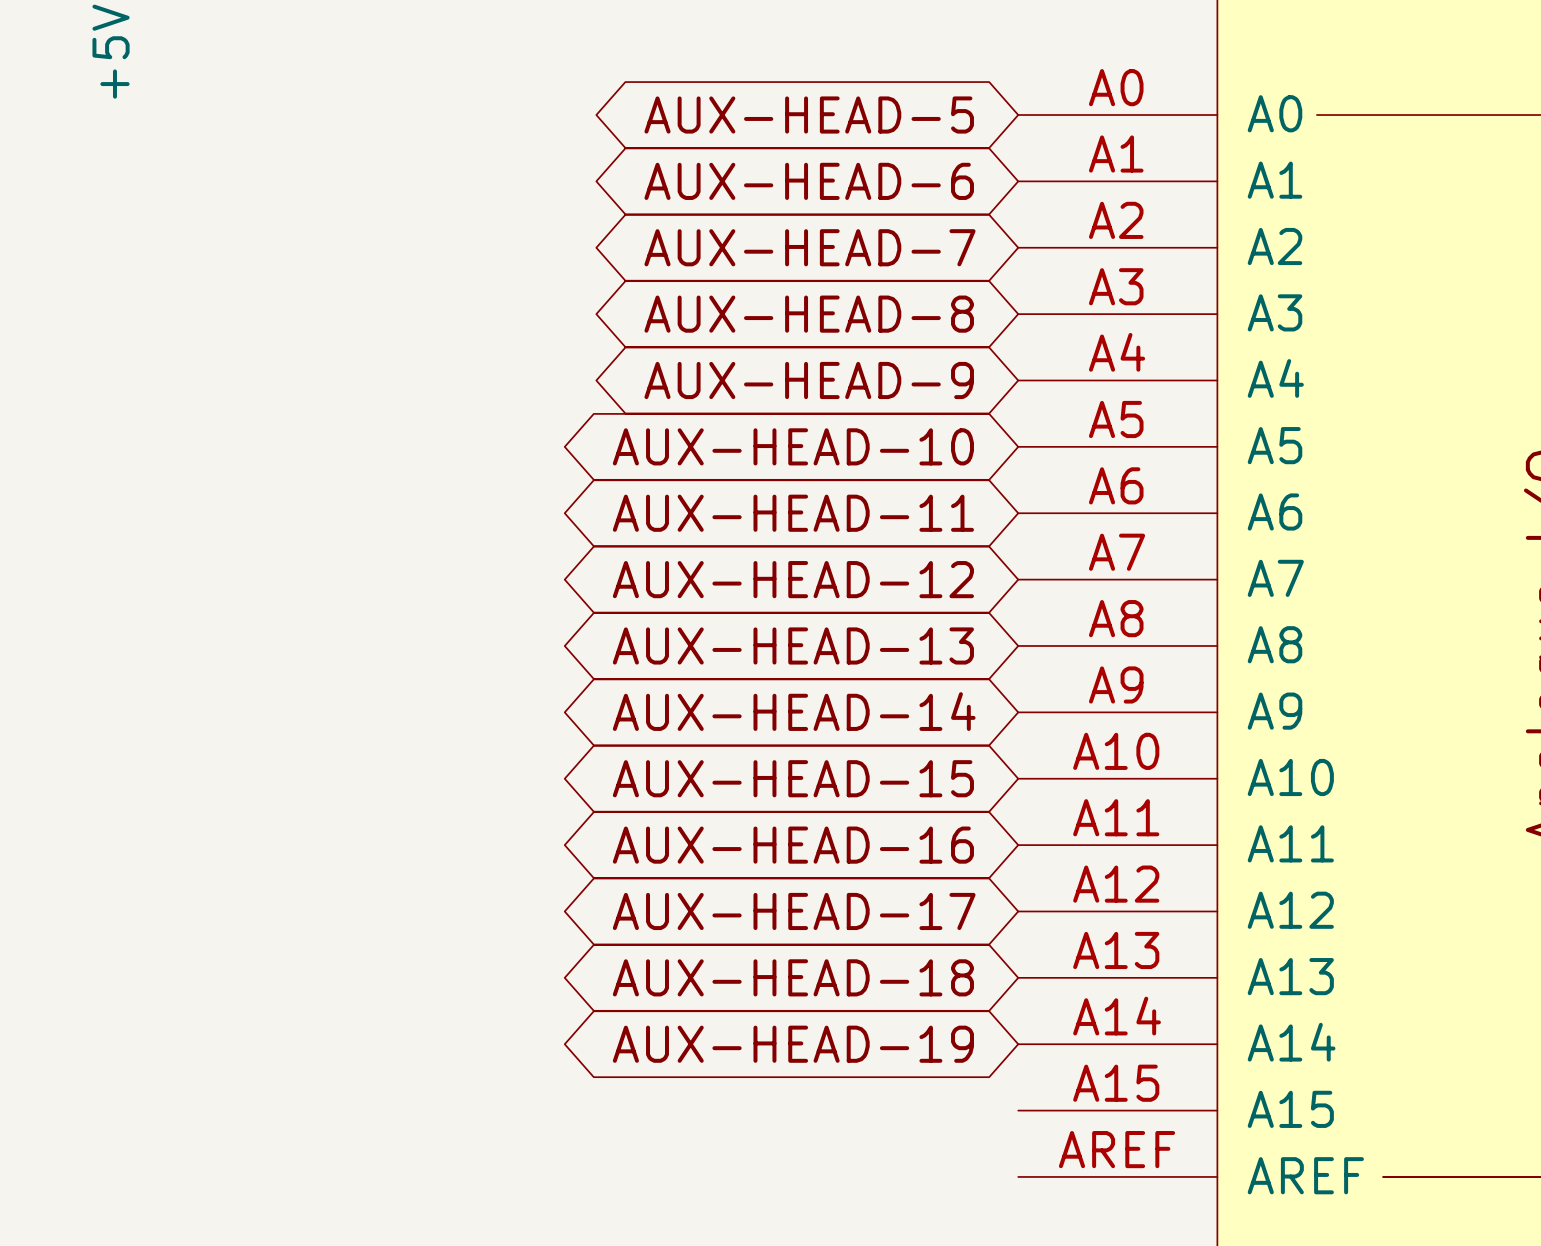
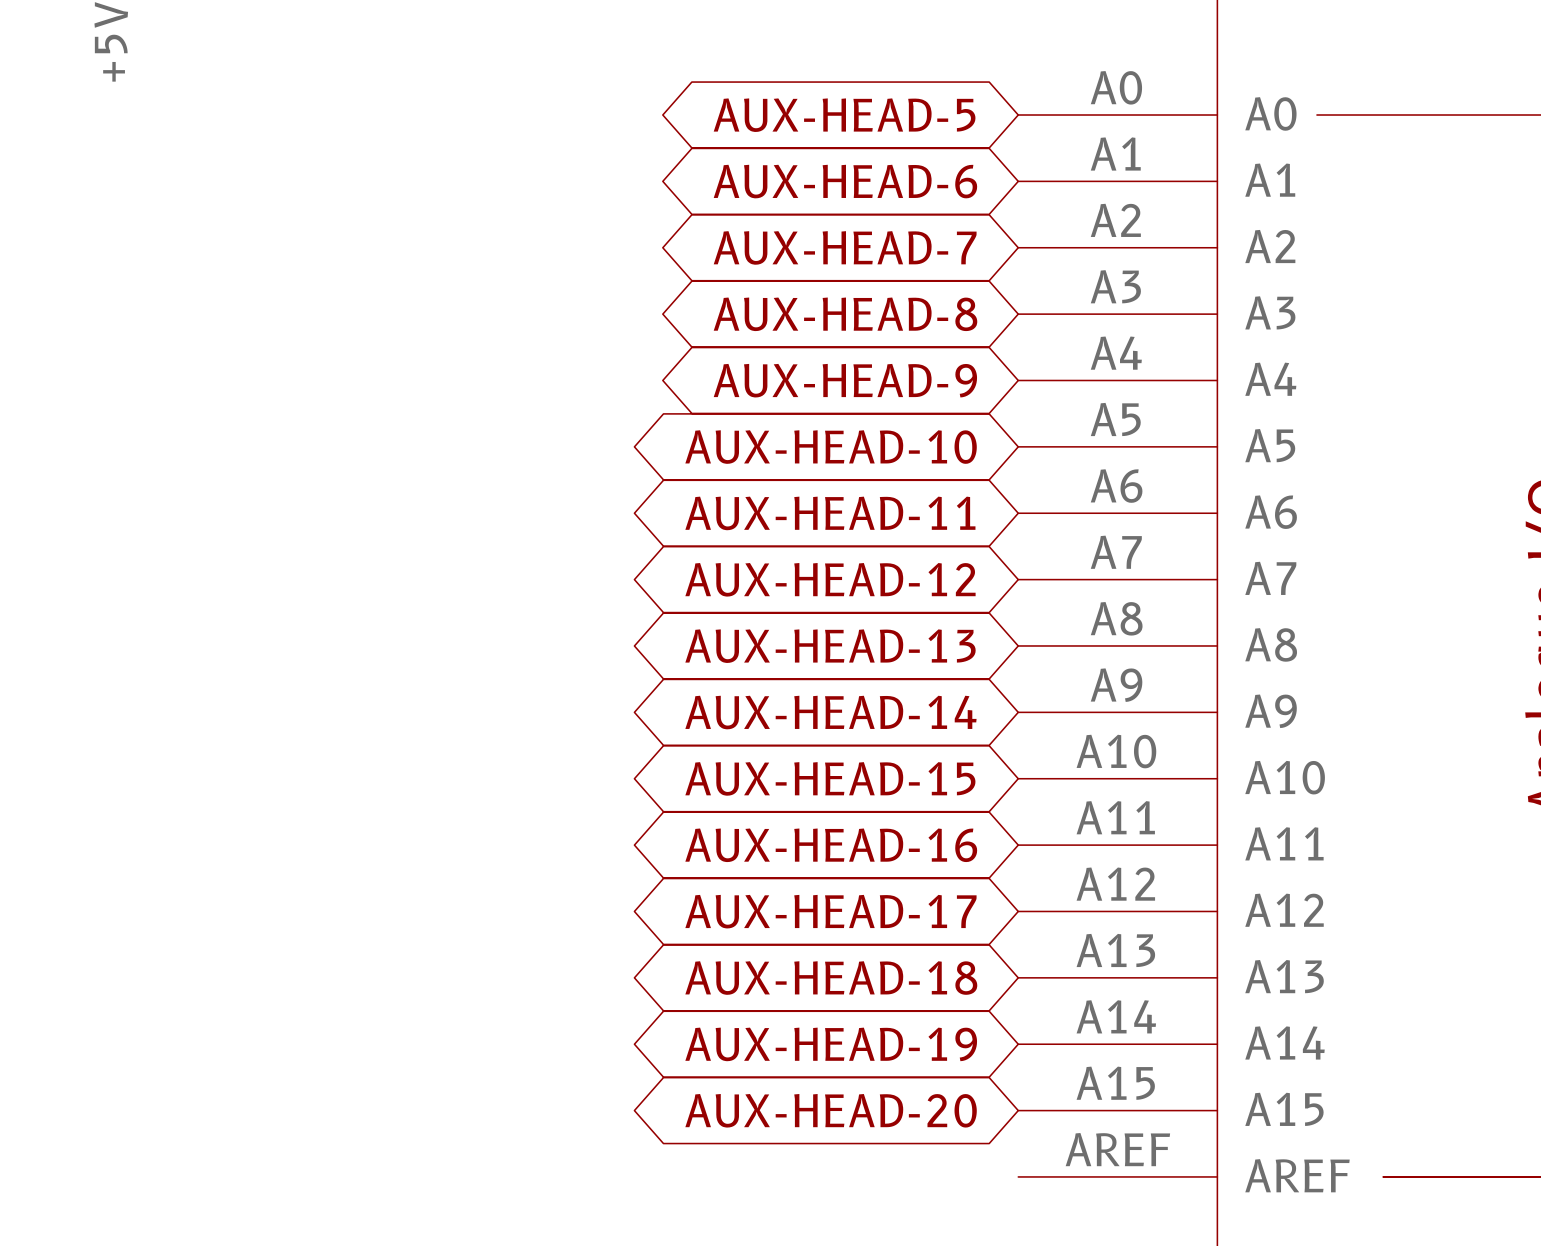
global label: none -> AUX-HEAD-20 (831, 1110)

